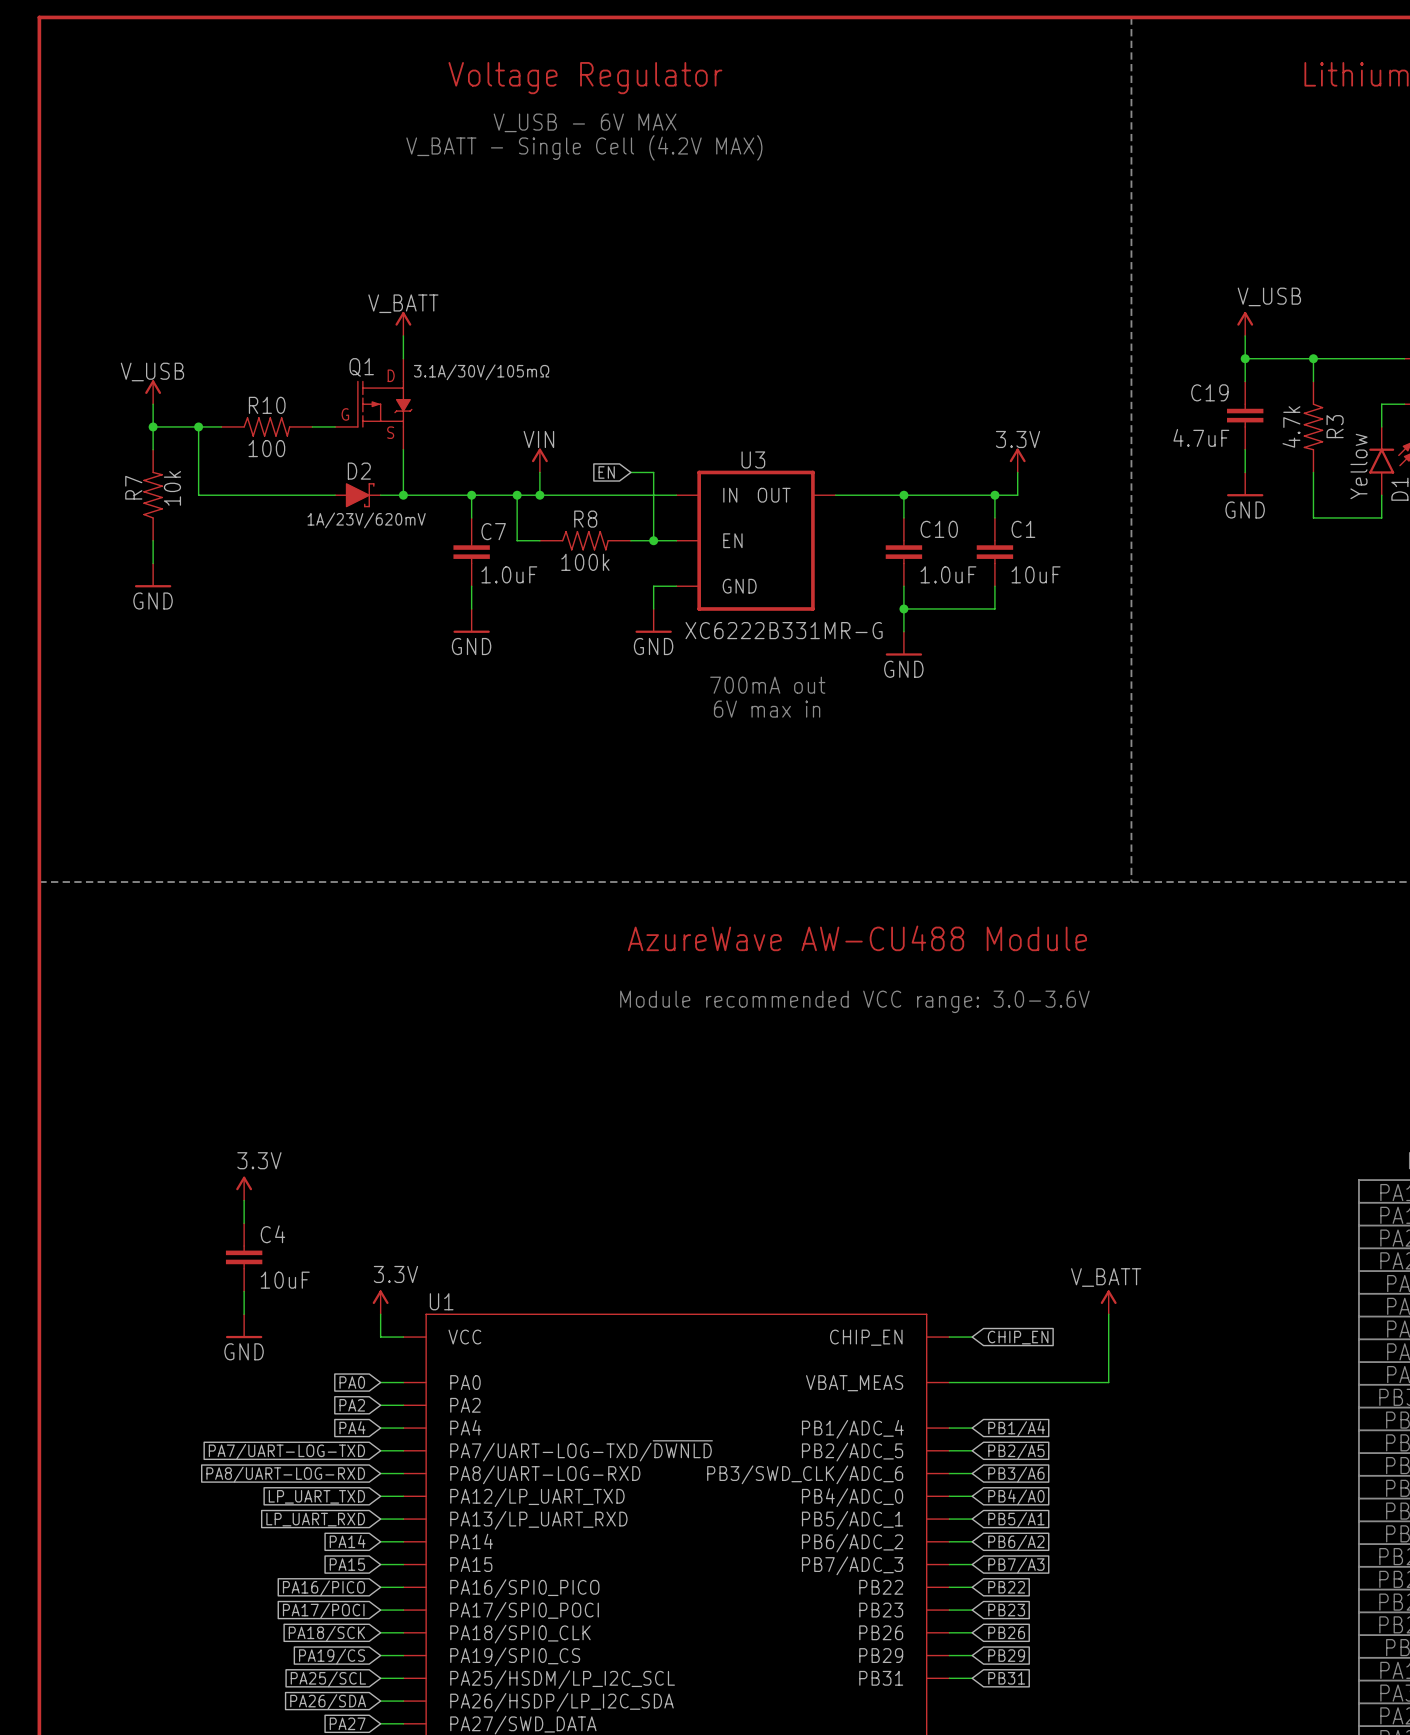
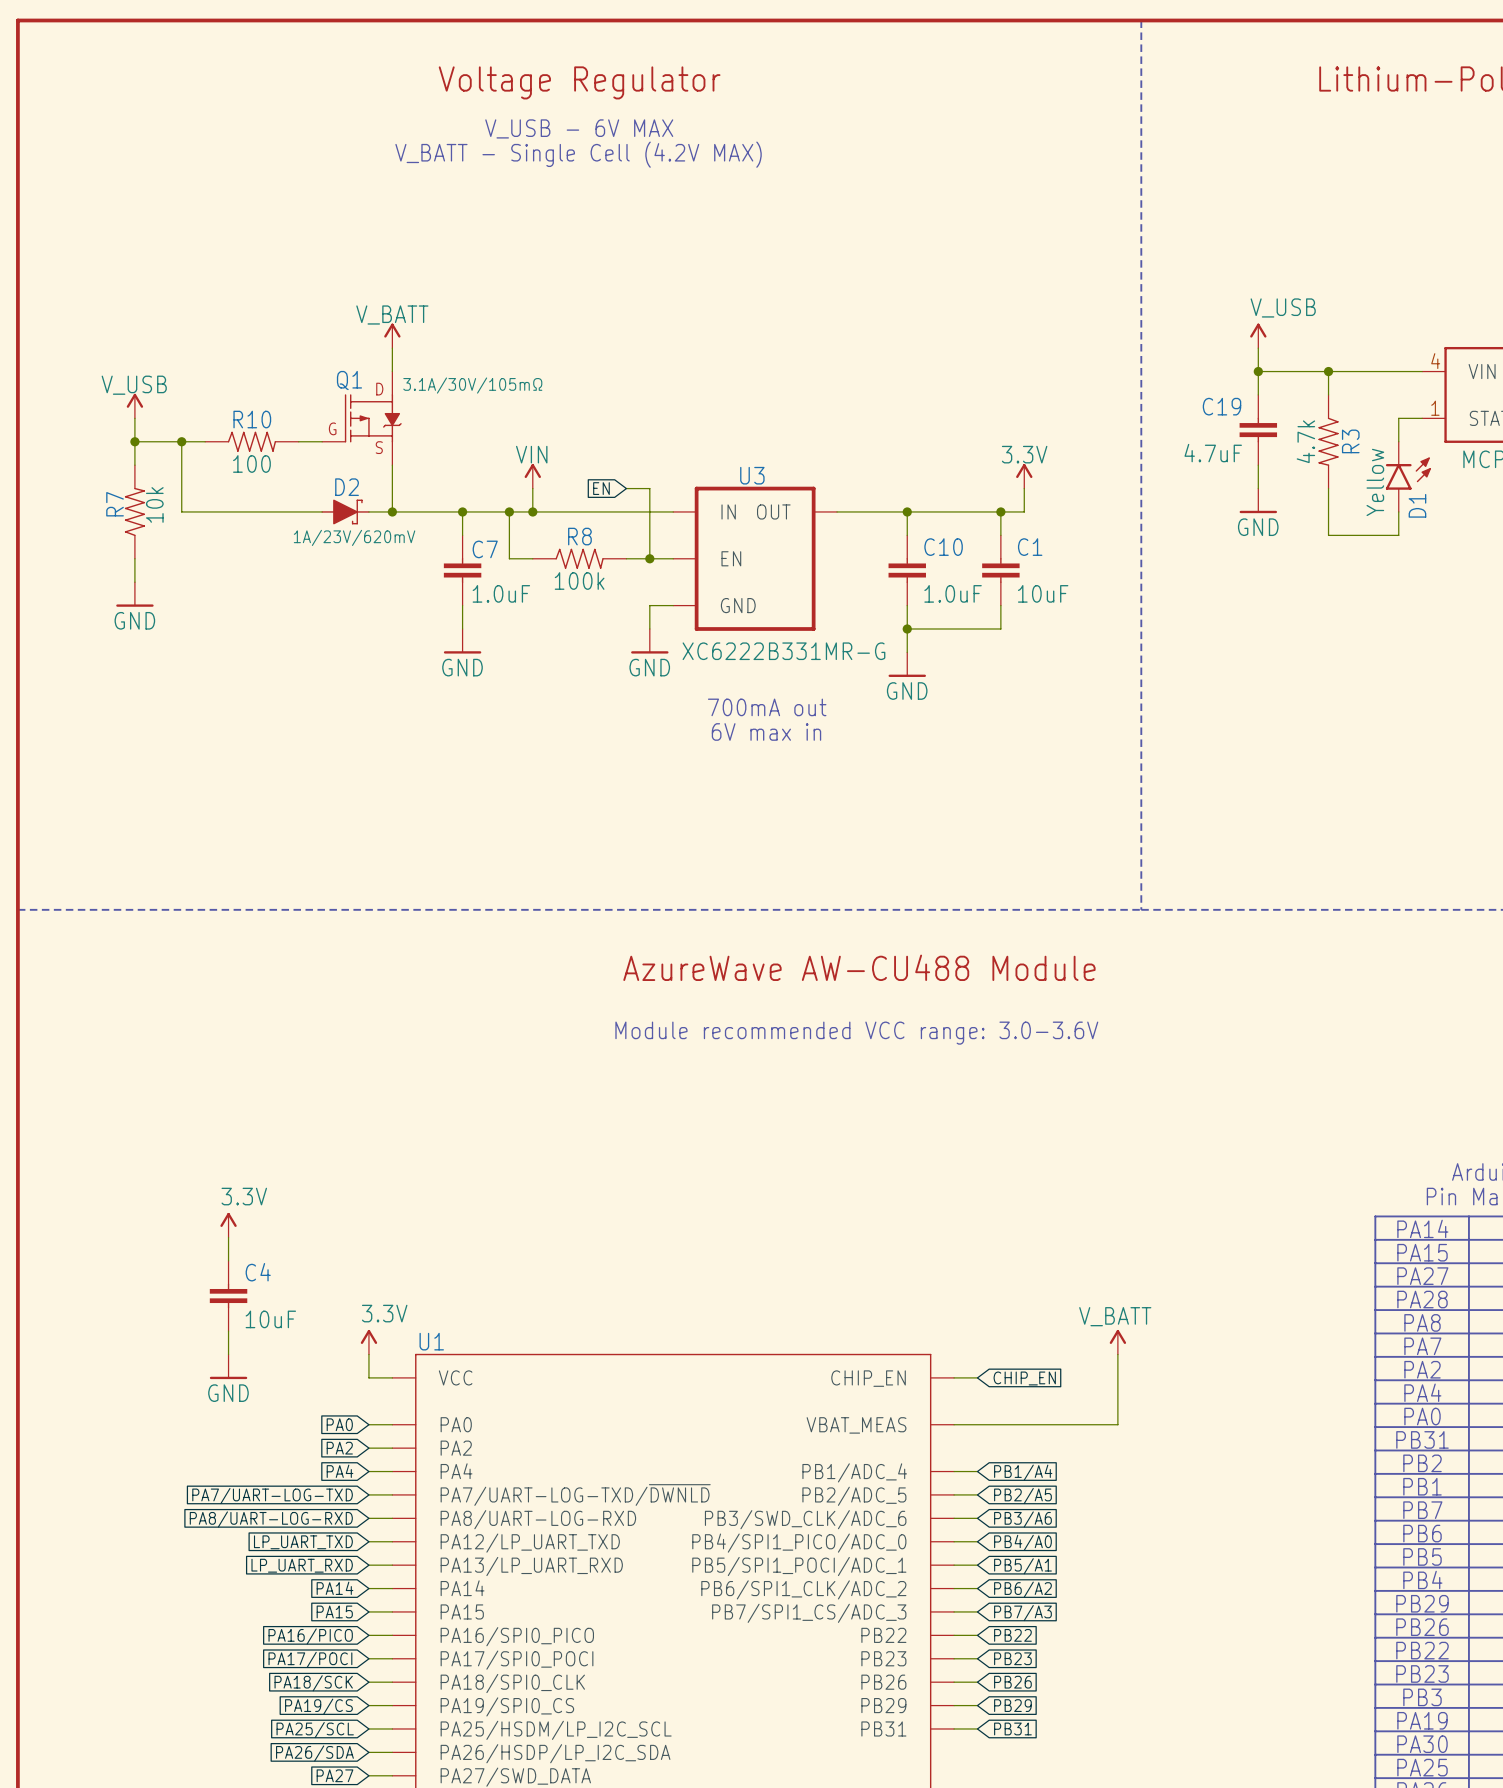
U1 pin name: PB4/ADC_0 (852, 1497) -> PB4/SPI1_PICO/ADC_0 (799, 1543)
U1 pin name: PB5/ADC_1 (852, 1520) -> PB5/SPI1_POCI/ADC_1 (799, 1566)
U1 pin name: PB6/ADC_2 (852, 1543) -> PB6/SPI1_CLK/ADC_2 (803, 1589)
U1 pin name: PB7/ADC_3 (852, 1565) -> PB7/SPI1_CS/ADC_3 (809, 1613)

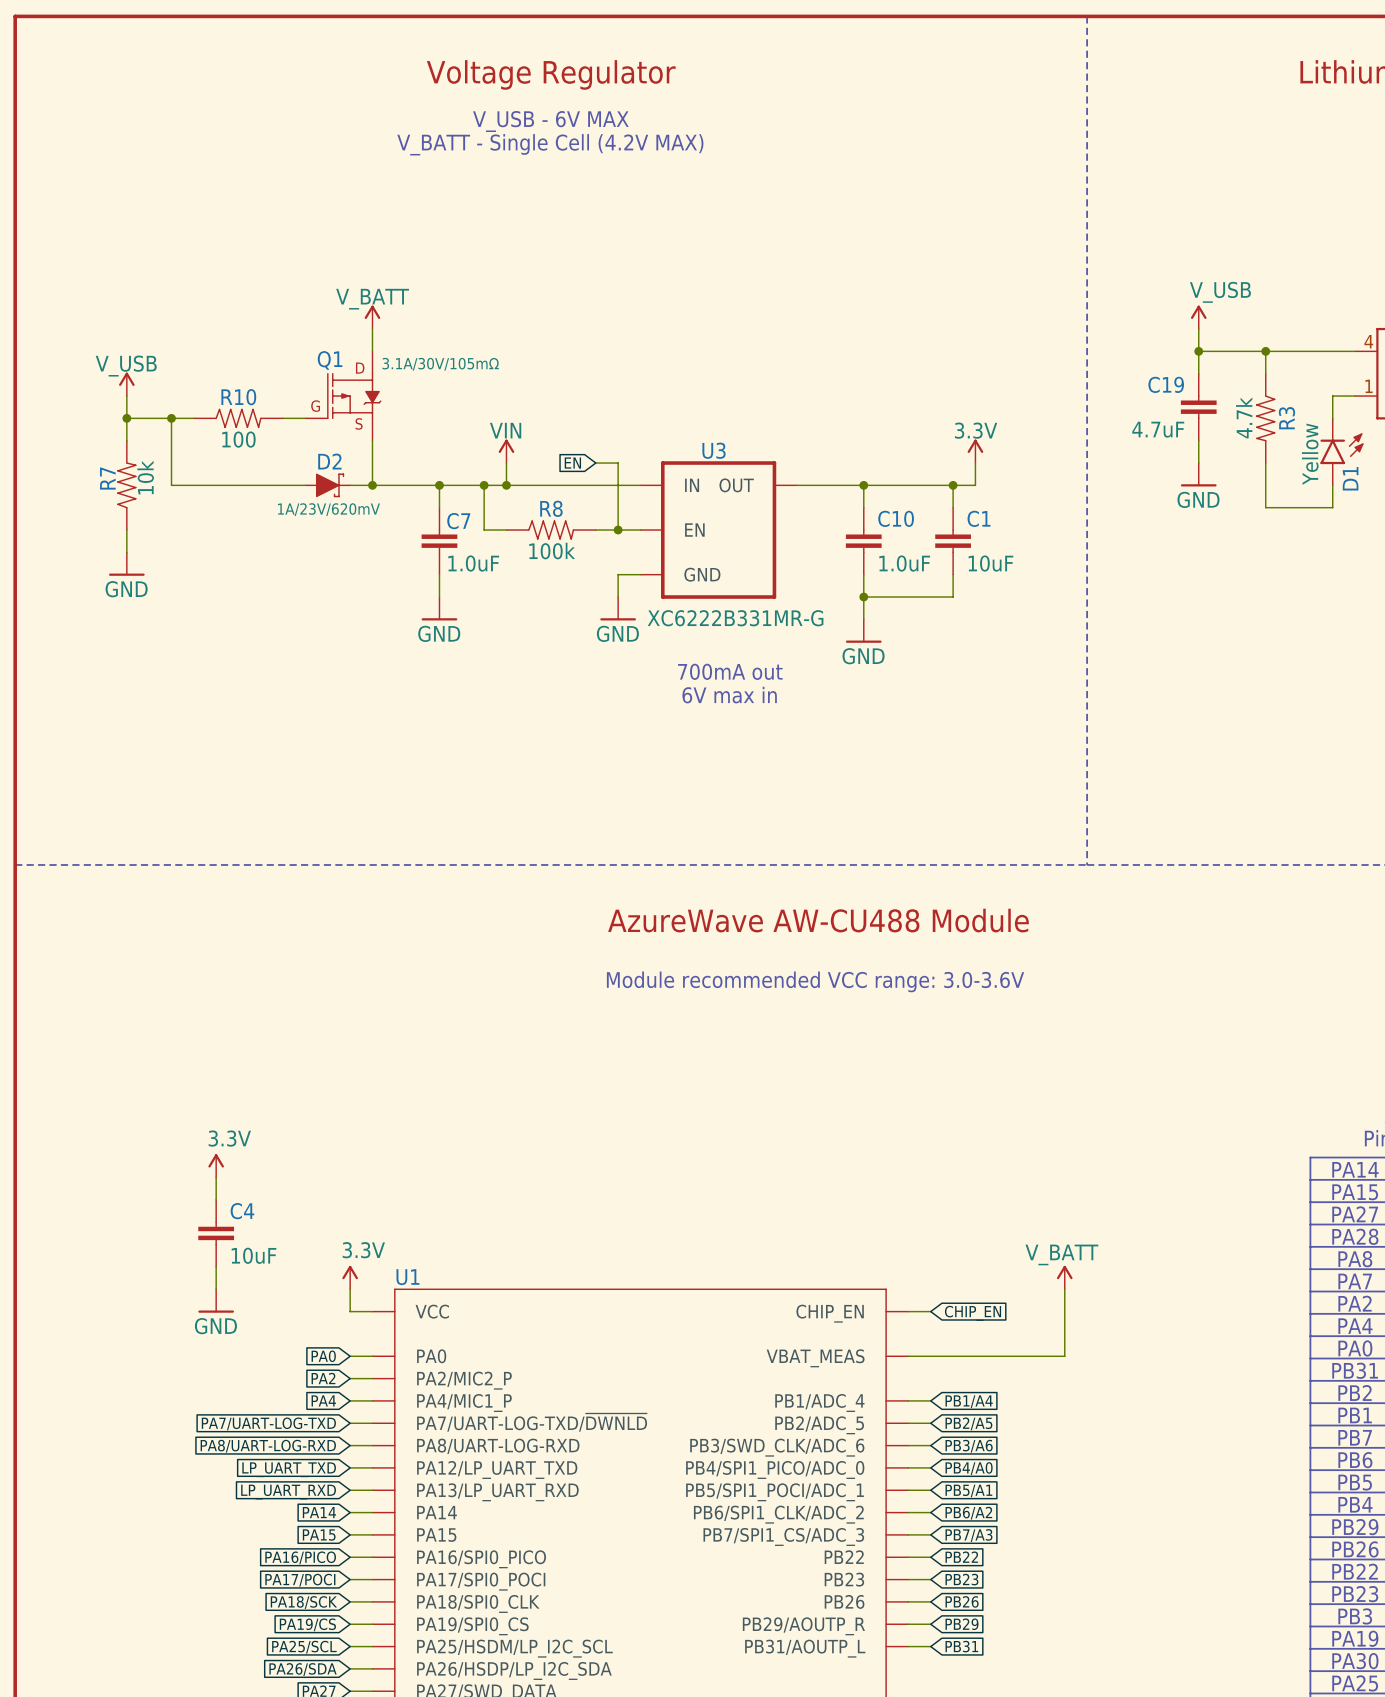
U1 pin name: PA2 (456, 1448) -> PA2/MIC2_P (464, 1380)
U1 pin name: PA4 (456, 1471) -> PA4/MIC1_P (464, 1402)
U1 pin name: PB29 (883, 1705) -> PB29/AOUTP_R (803, 1626)
U1 pin name: PB31 (883, 1728) -> PB31/AOUTP_L (805, 1648)

